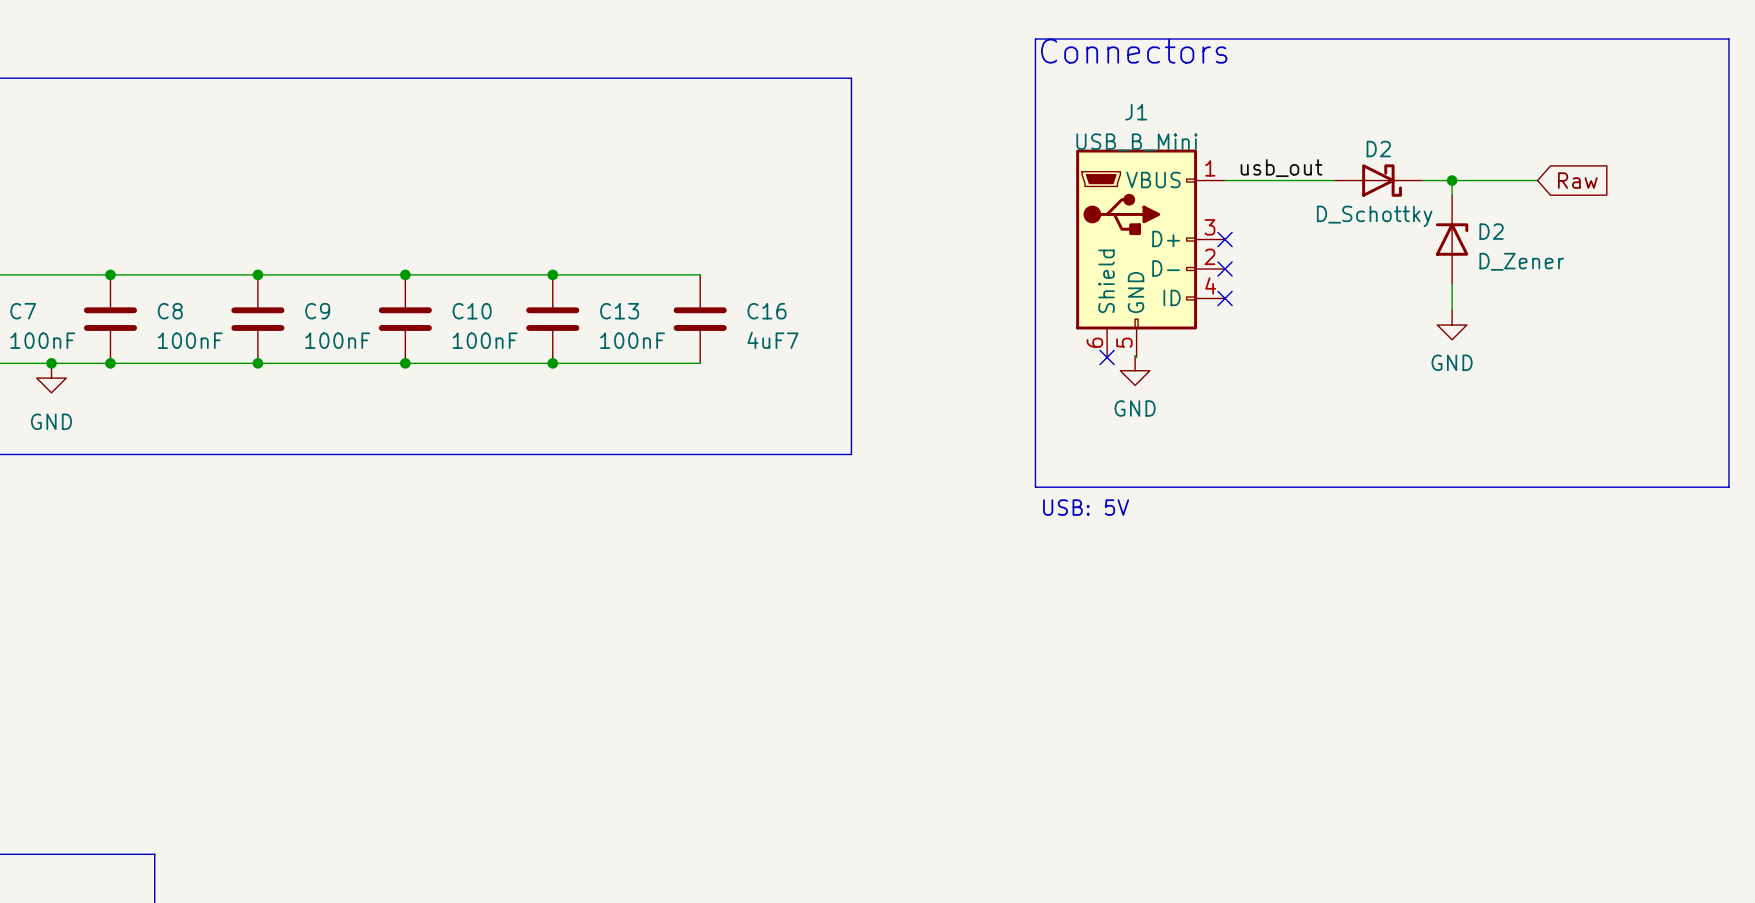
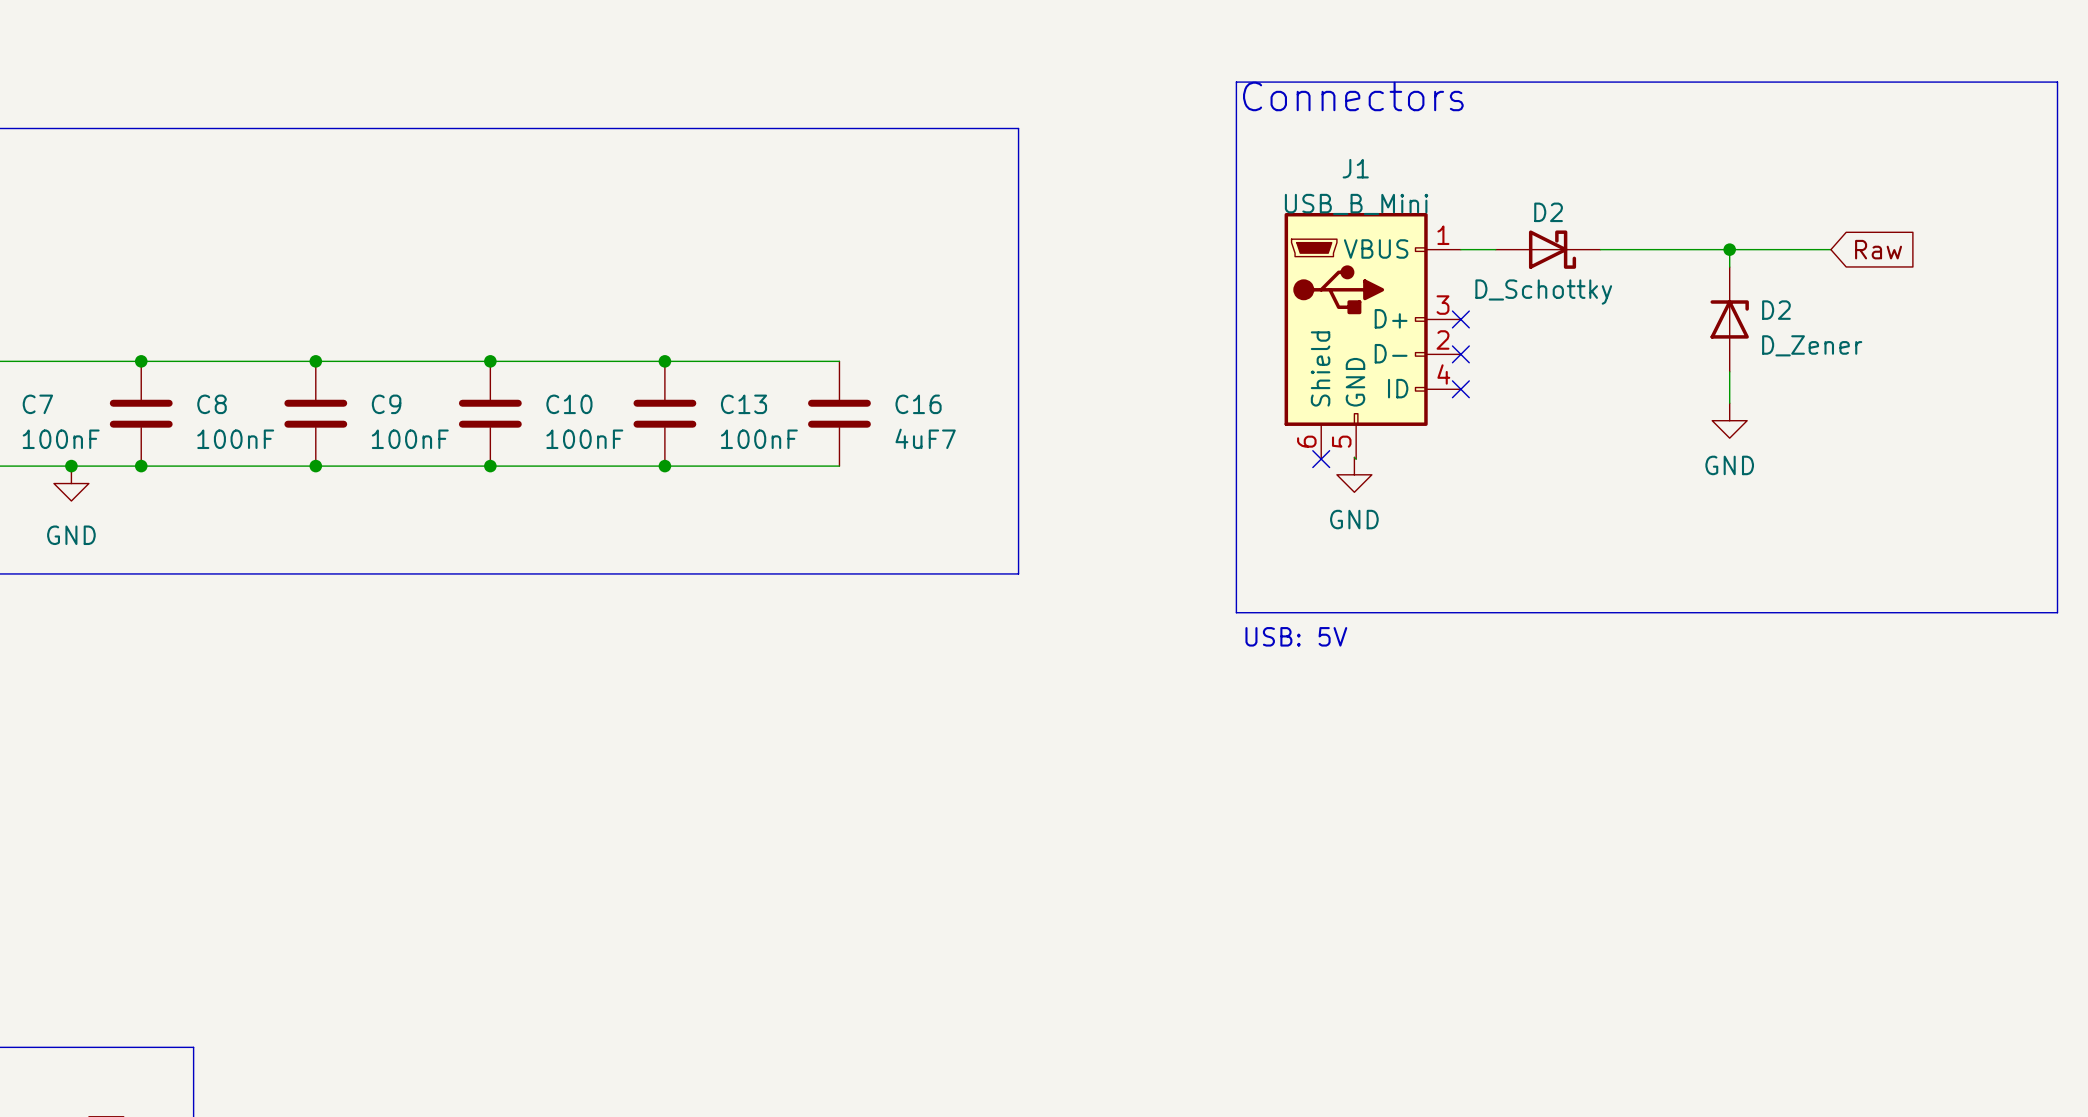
label: usb_out (1281, 168) -> none
D2 position: (1378, 180) -> (1548, 249)

